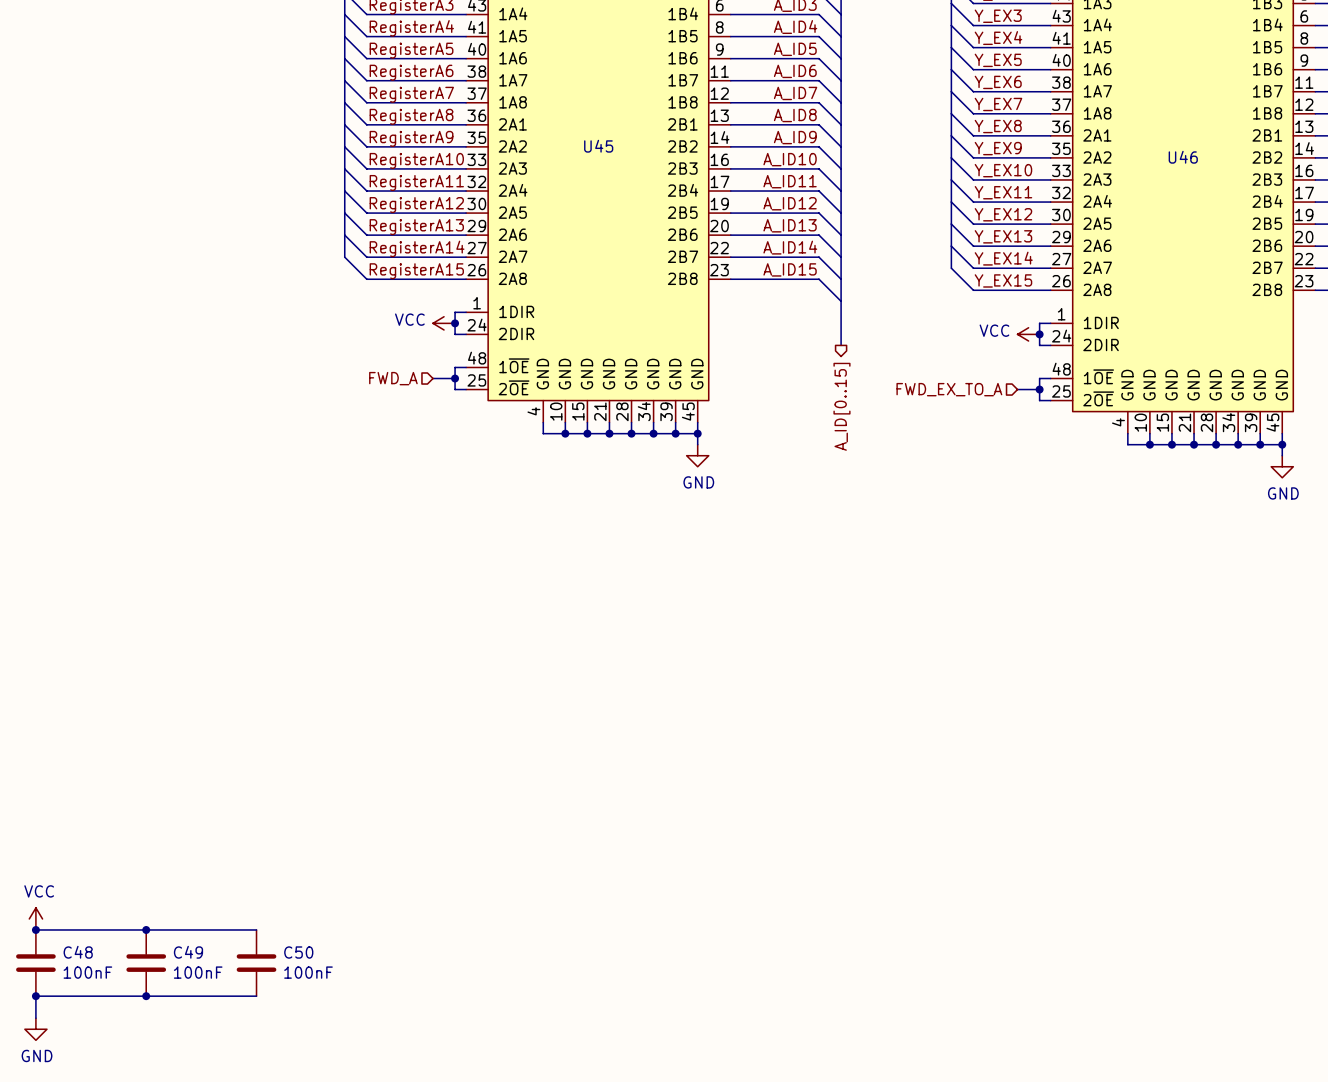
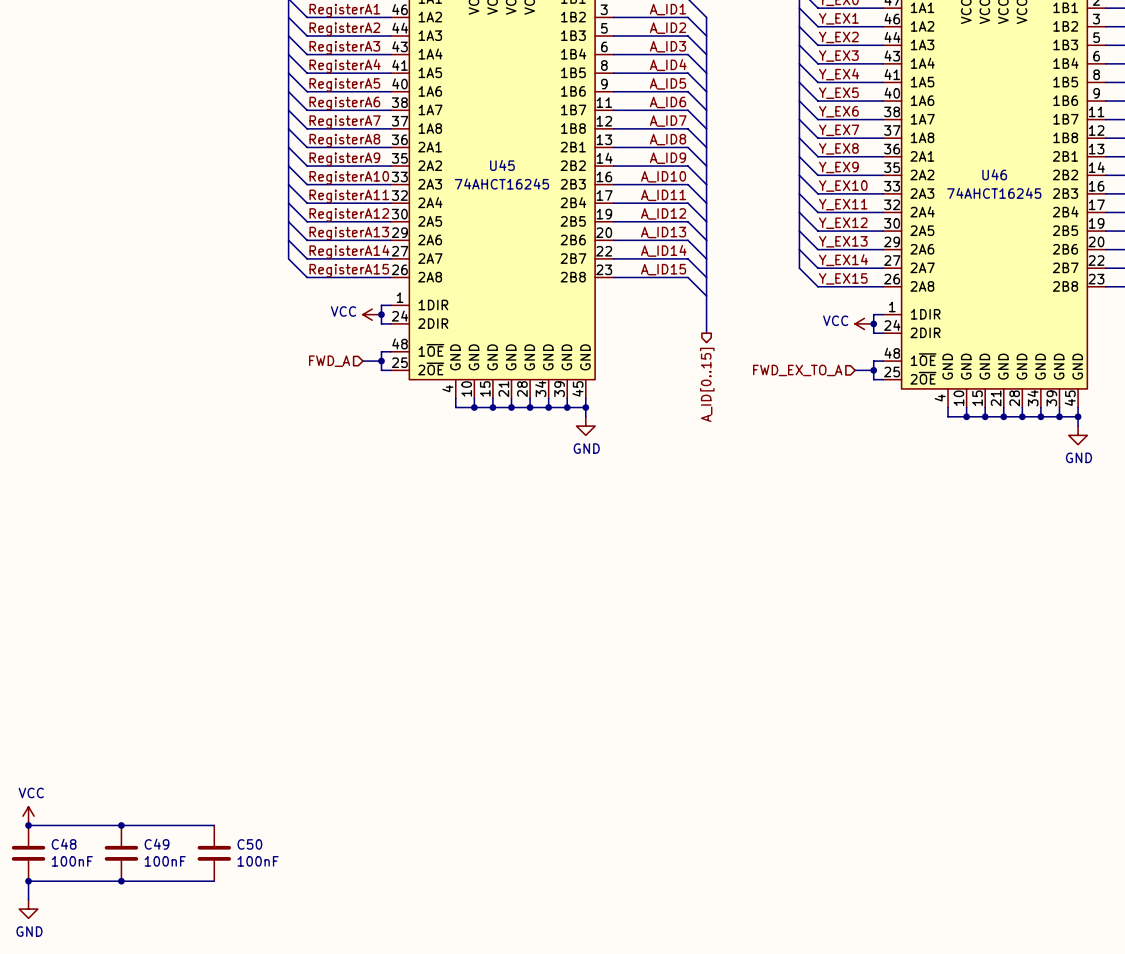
U45 value: none -> 74AHCT16245 (502, 184)
U46 value: none -> 74AHCT16245 (994, 193)

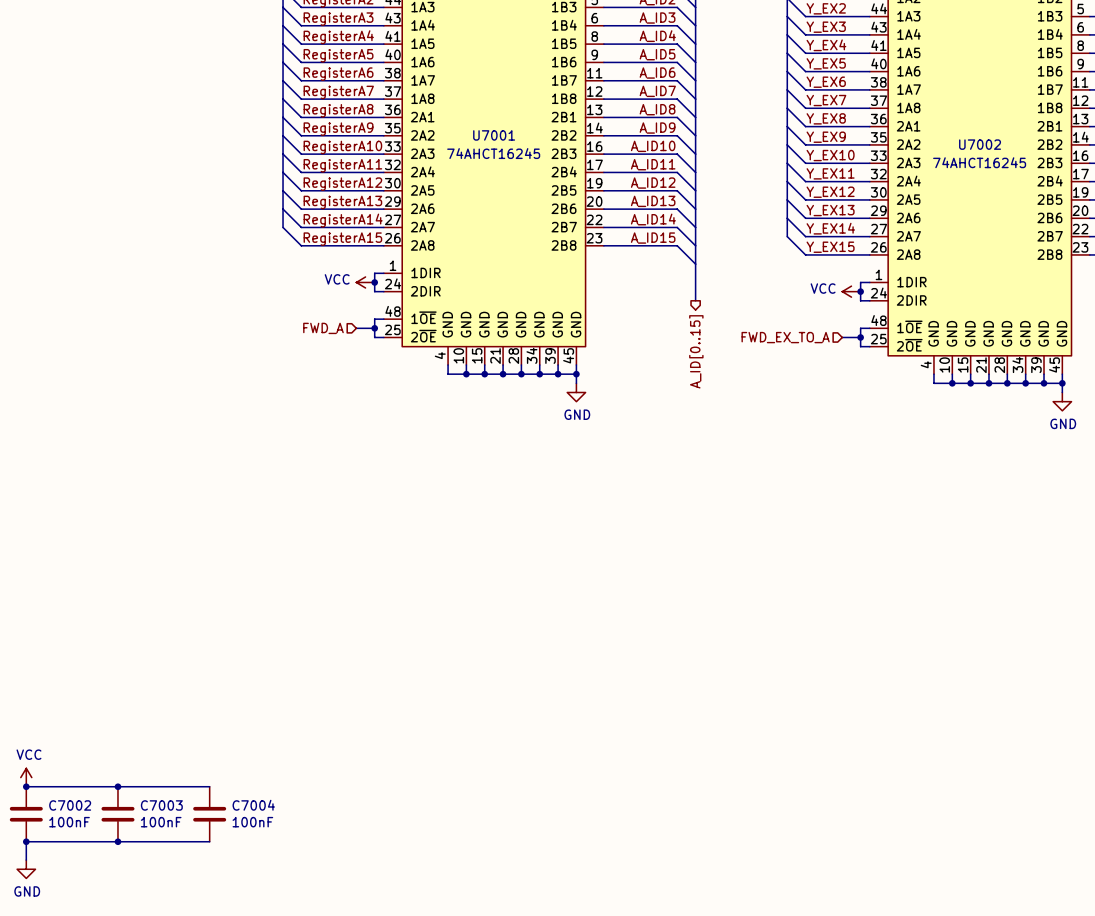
U45 name: U45 (502, 165) -> U7001 (494, 135)
U46 name: U46 (994, 174) -> U7002 (980, 144)
C48 name: C48 (64, 844) -> C7002 (70, 805)
C49 name: C49 (157, 844) -> C7003 (161, 805)
C50 name: C50 (249, 844) -> C7004 (253, 805)

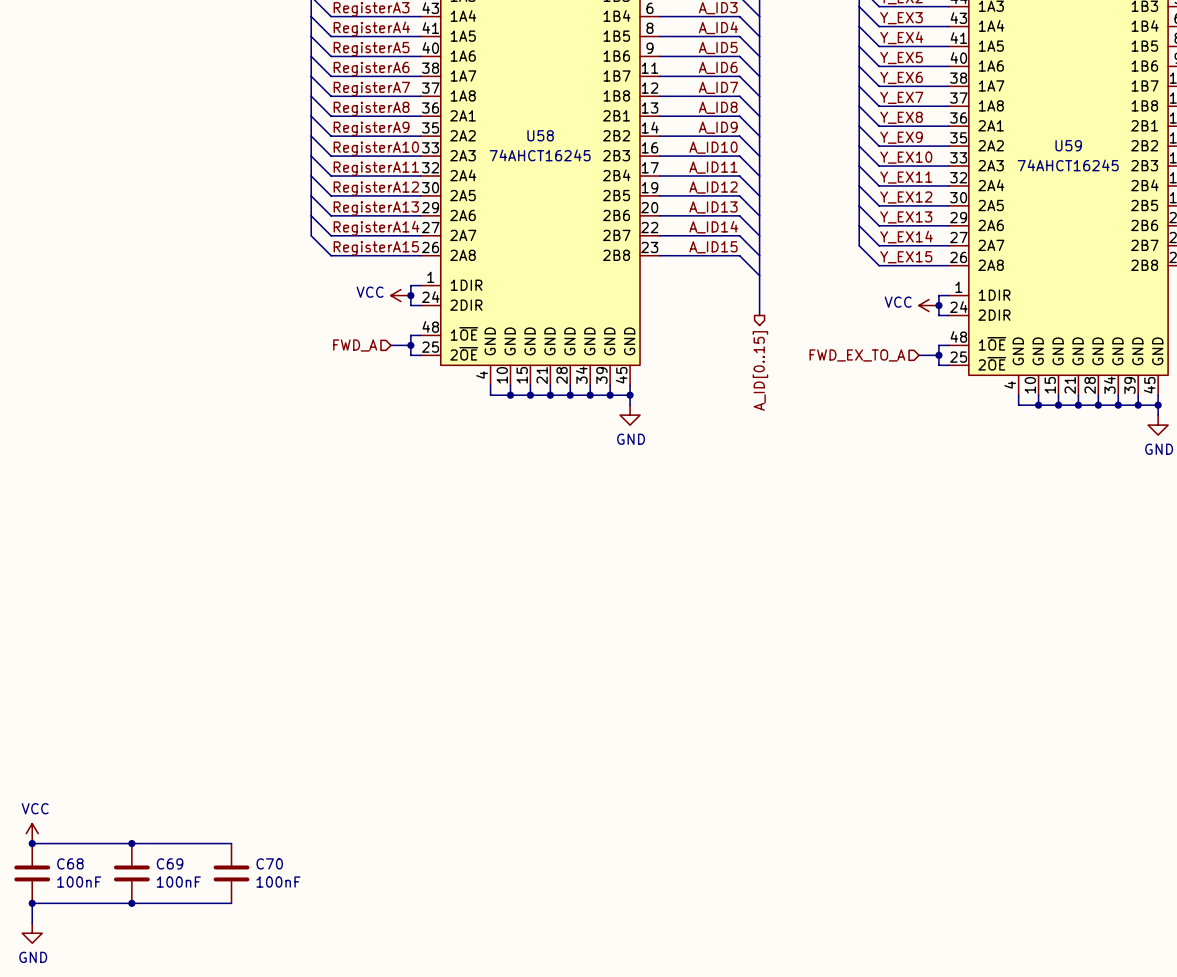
U7001 name: U7001 (494, 135) -> U58 (540, 135)
U7002 name: U7002 (980, 144) -> U59 (1068, 145)
C7002 name: C7002 (70, 805) -> C68 (70, 863)
C7003 name: C7003 (161, 805) -> C69 (170, 863)
C7004 name: C7004 (253, 805) -> C70 (269, 863)

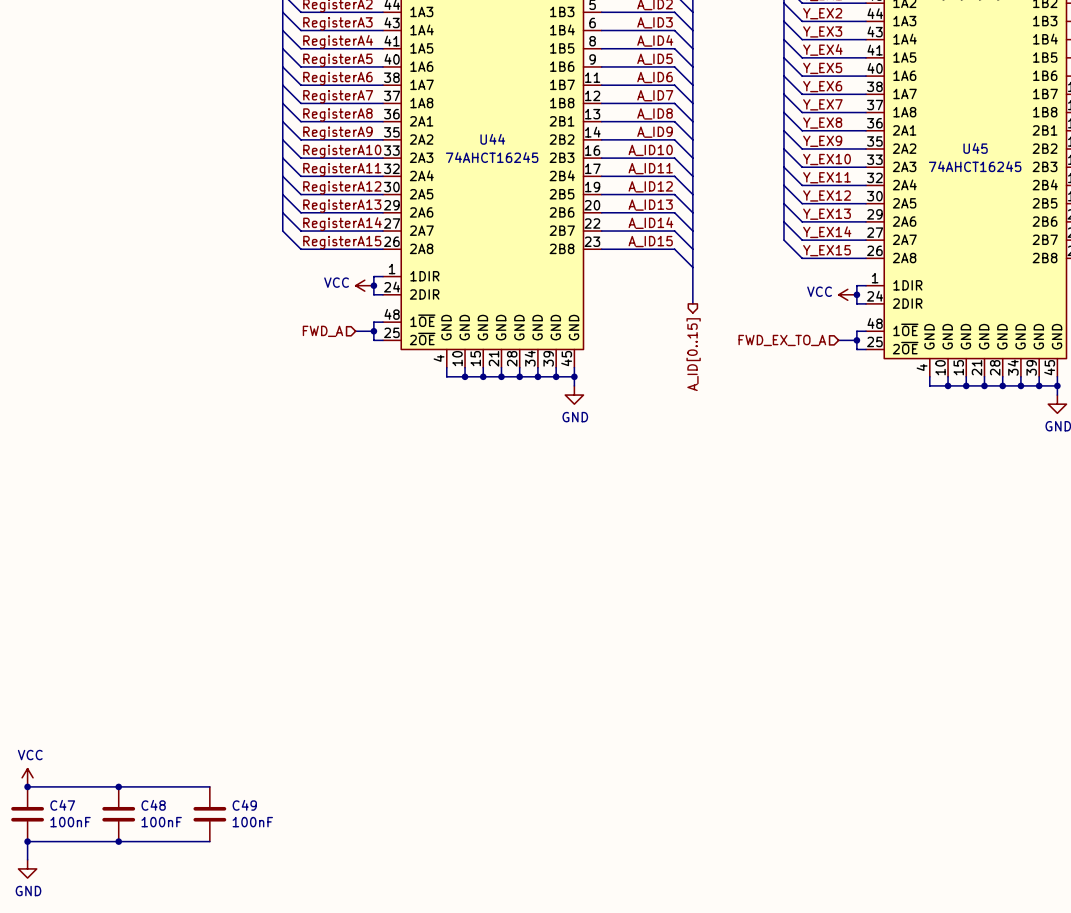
U58 name: U58 (540, 135) -> U44 (492, 139)
U59 name: U59 (1068, 145) -> U45 (975, 148)
C68 name: C68 (70, 863) -> C47 (62, 805)
C69 name: C69 (170, 863) -> C48 (153, 805)
C70 name: C70 (269, 863) -> C49 (244, 805)

